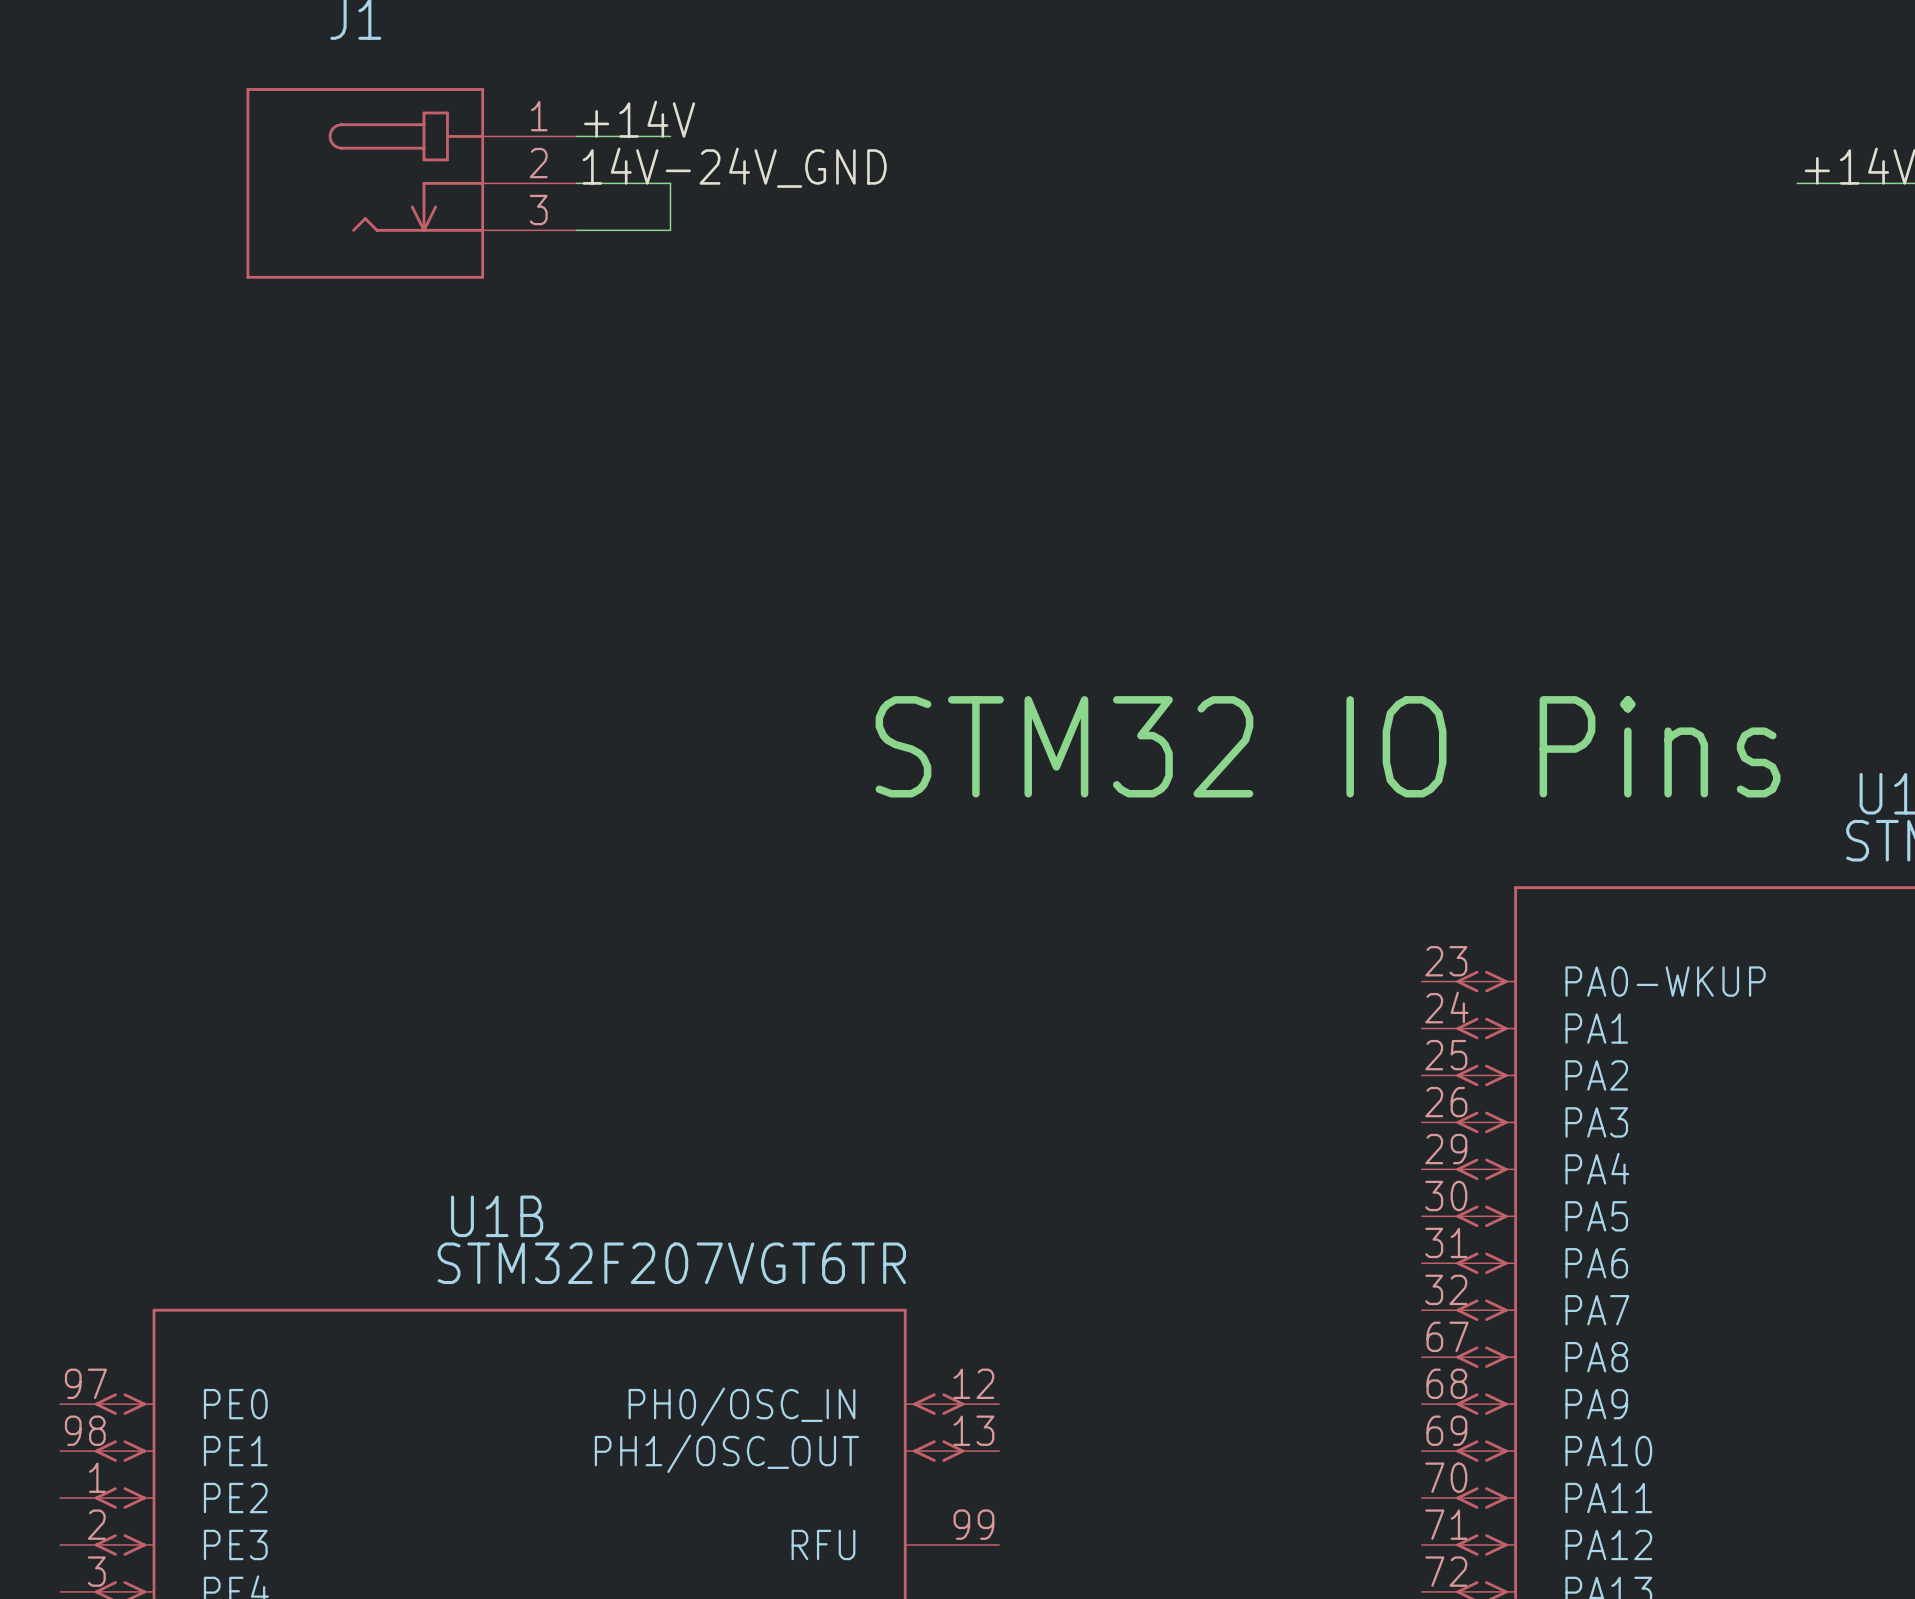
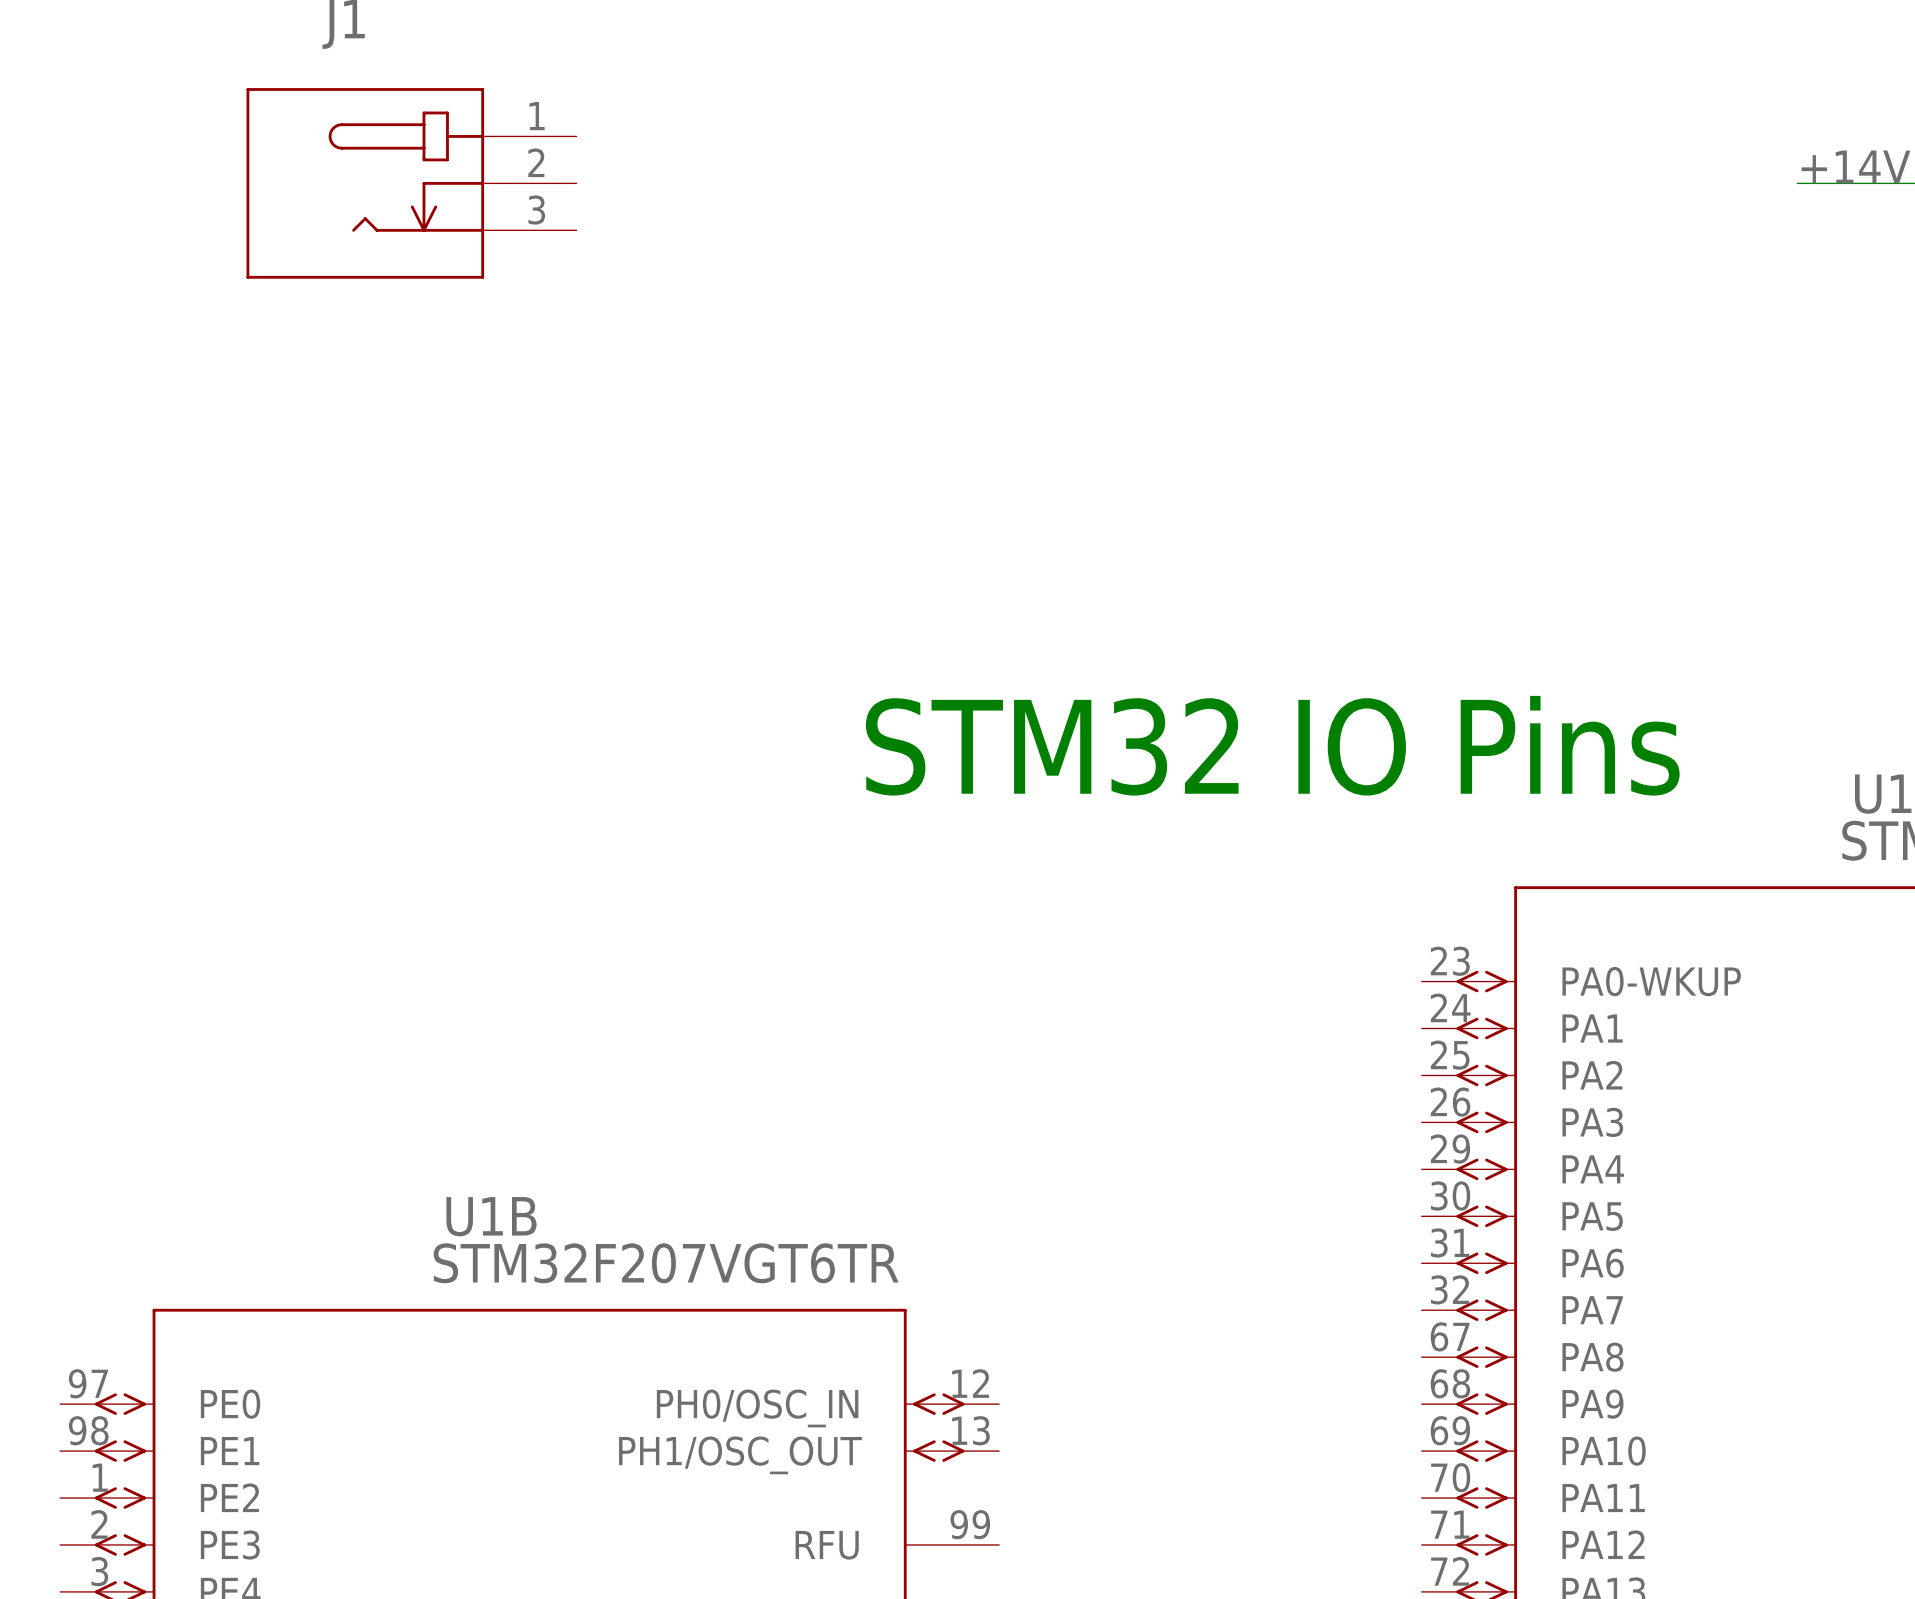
label: +14V (639, 119) -> none
wire: (576, 136) (670, 136) -> none
label: 14V-24V_GND (734, 167) -> none
wire: (576, 183) (670, 183) (670, 230) (576, 230) -> none

